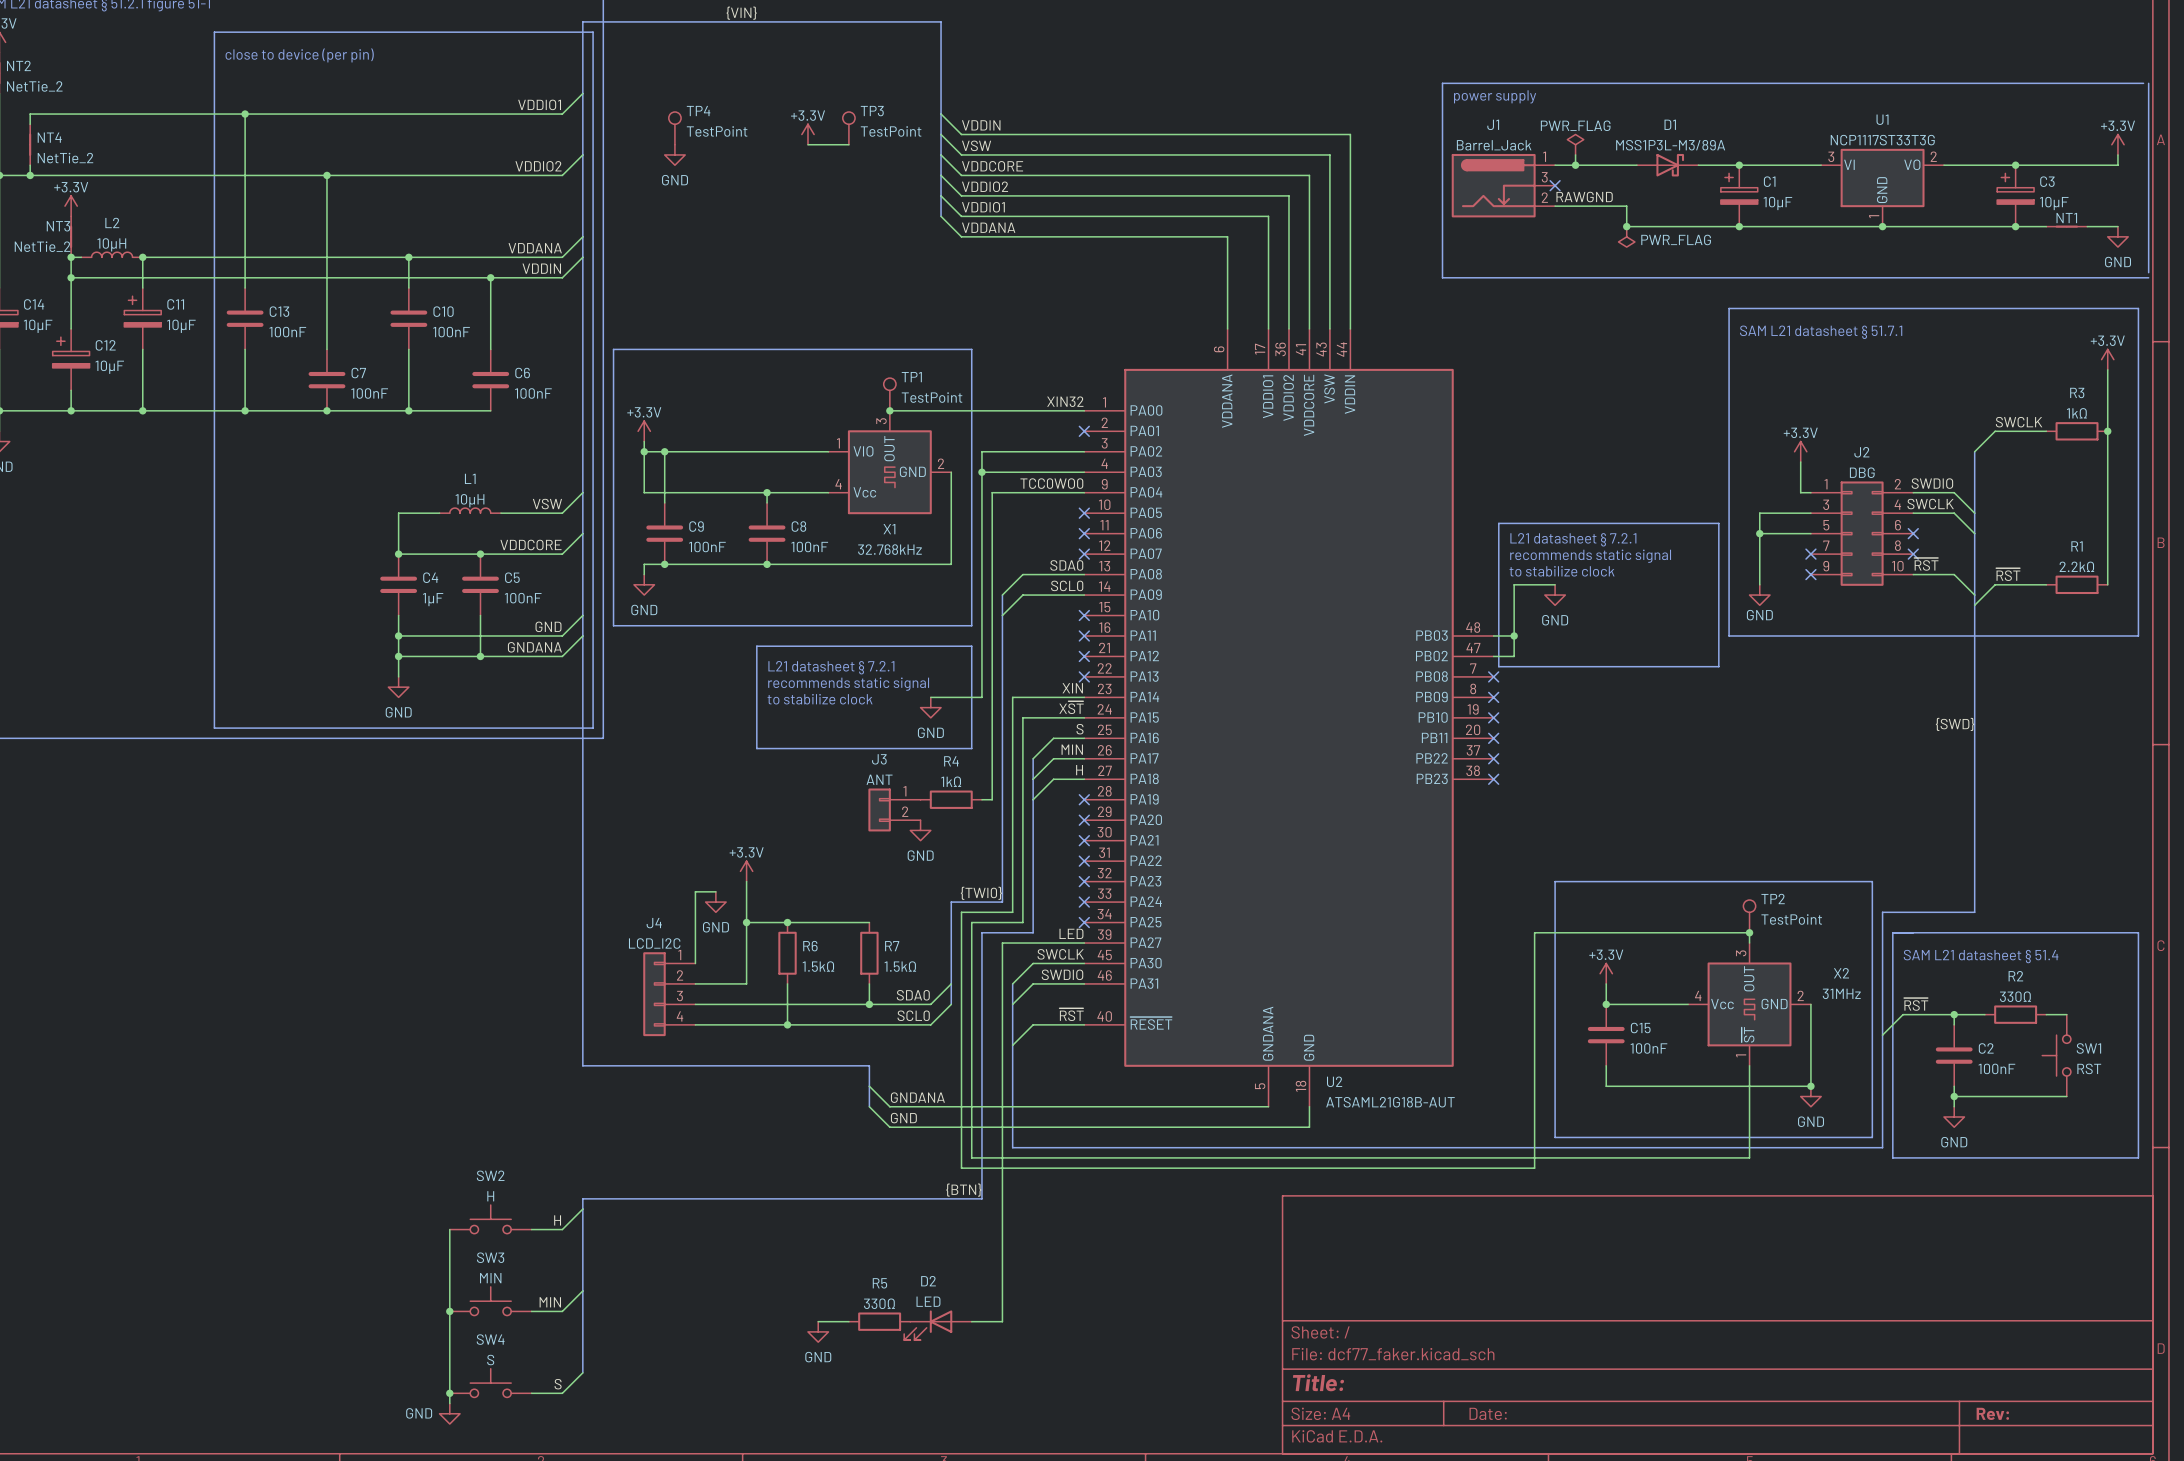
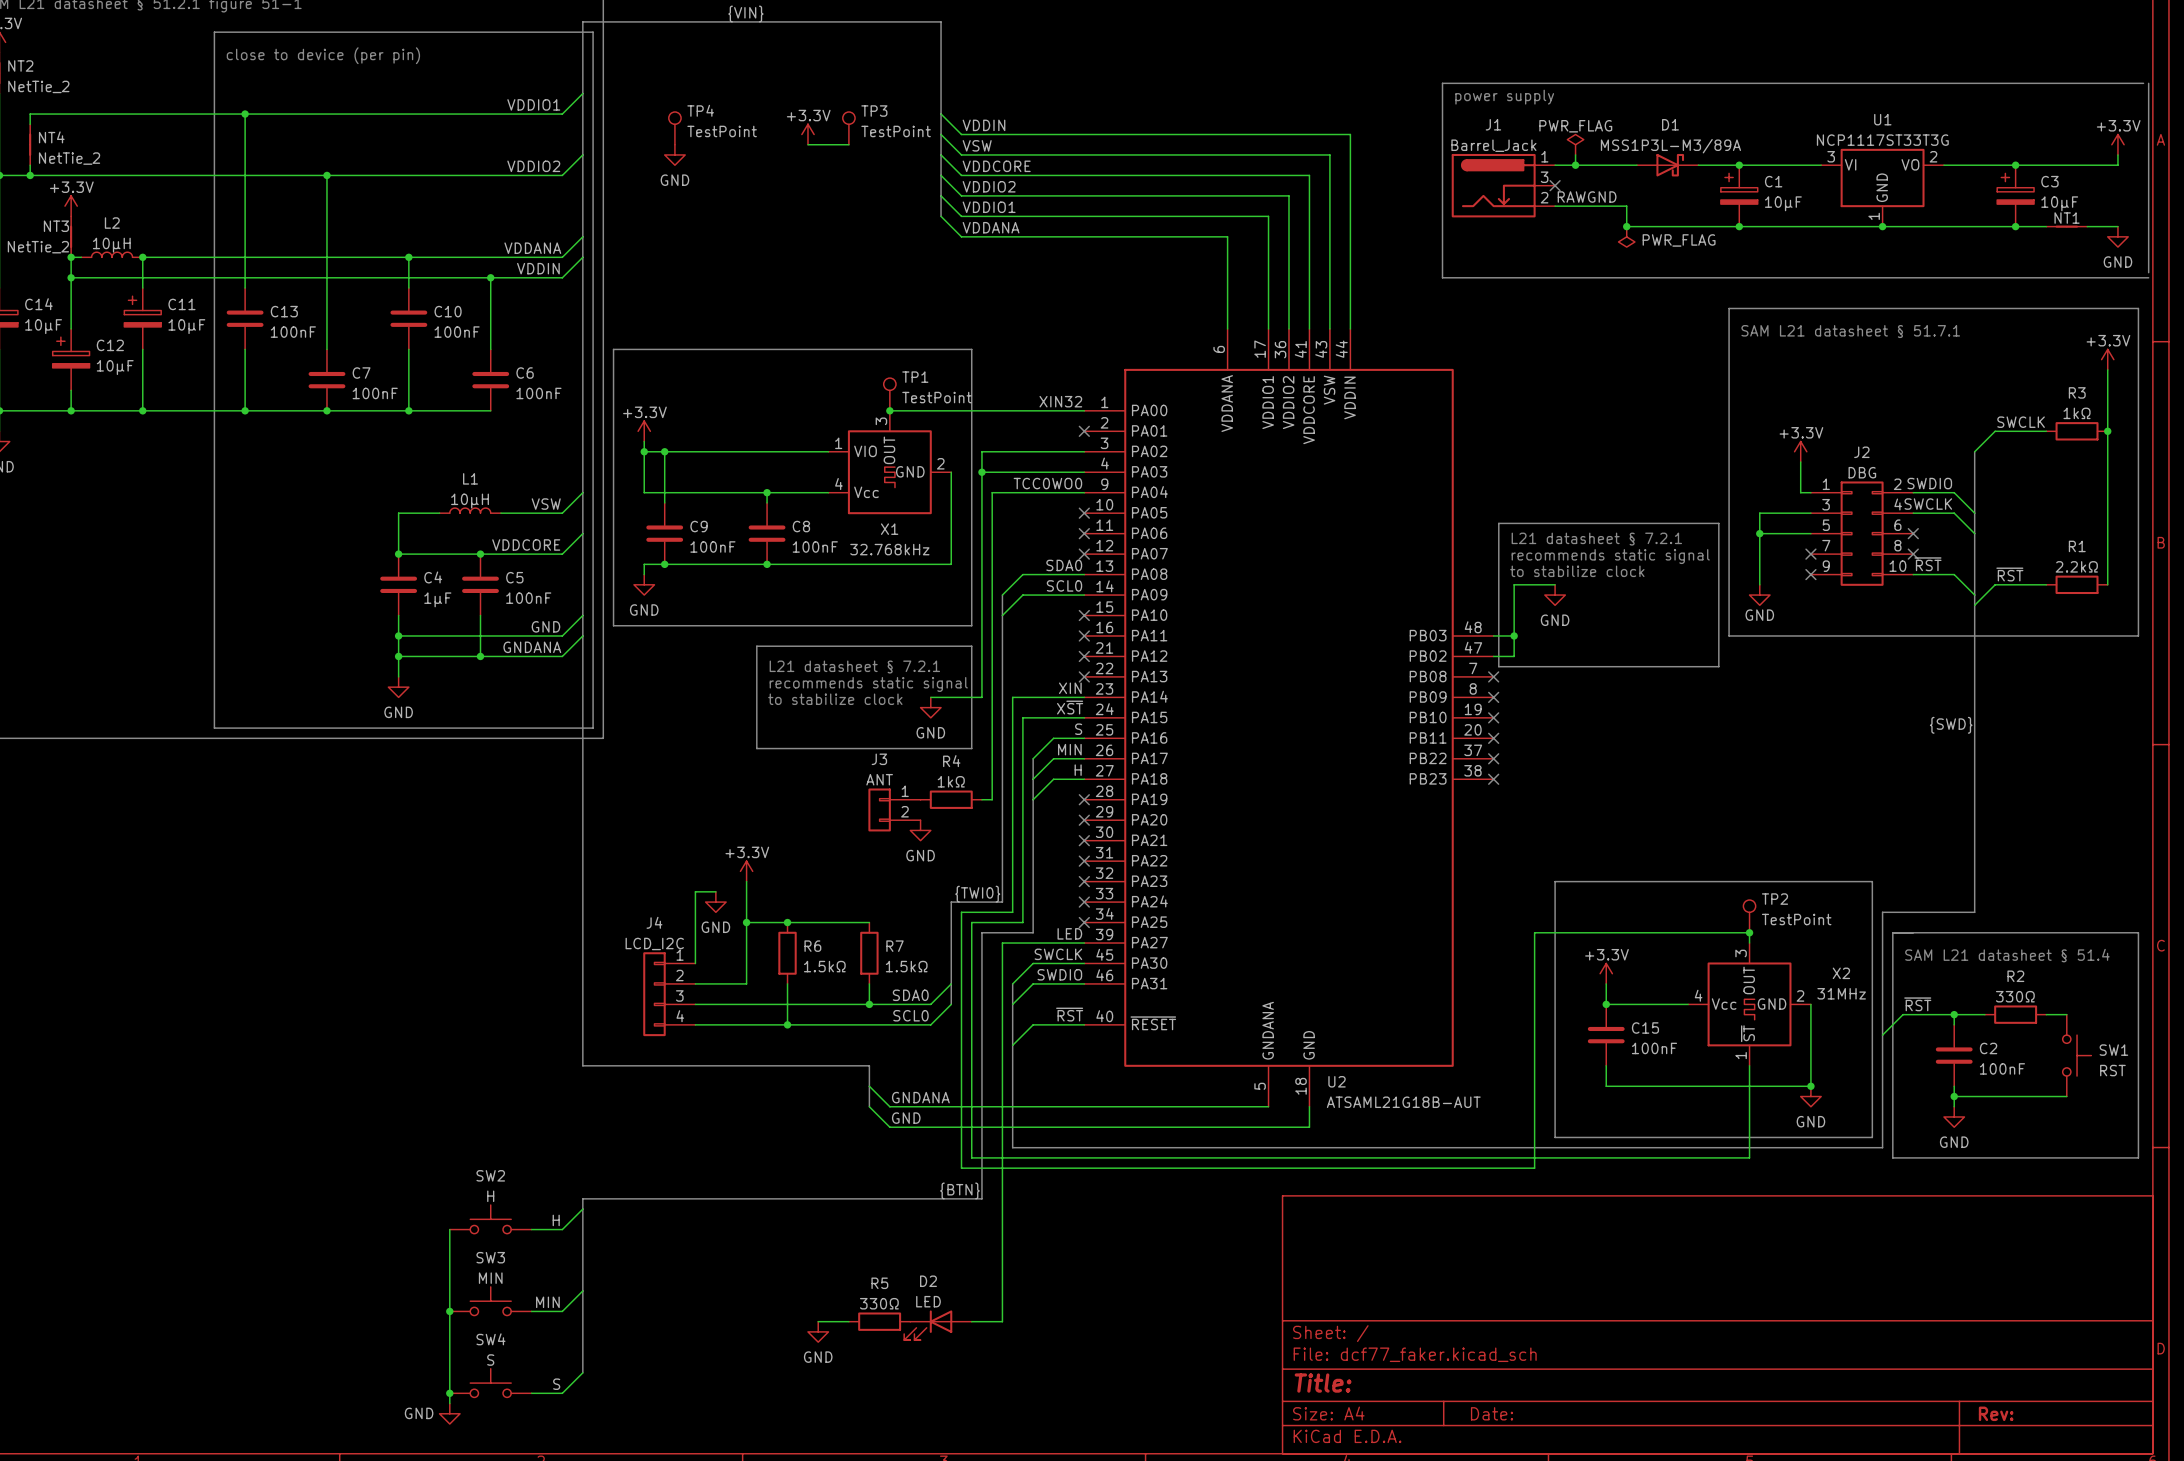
SW1 rotation: 0° (2056, 1055) -> 180° (2077, 1055)

